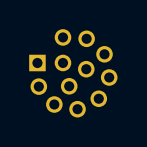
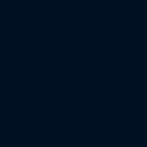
part: (73, 73) -> none

